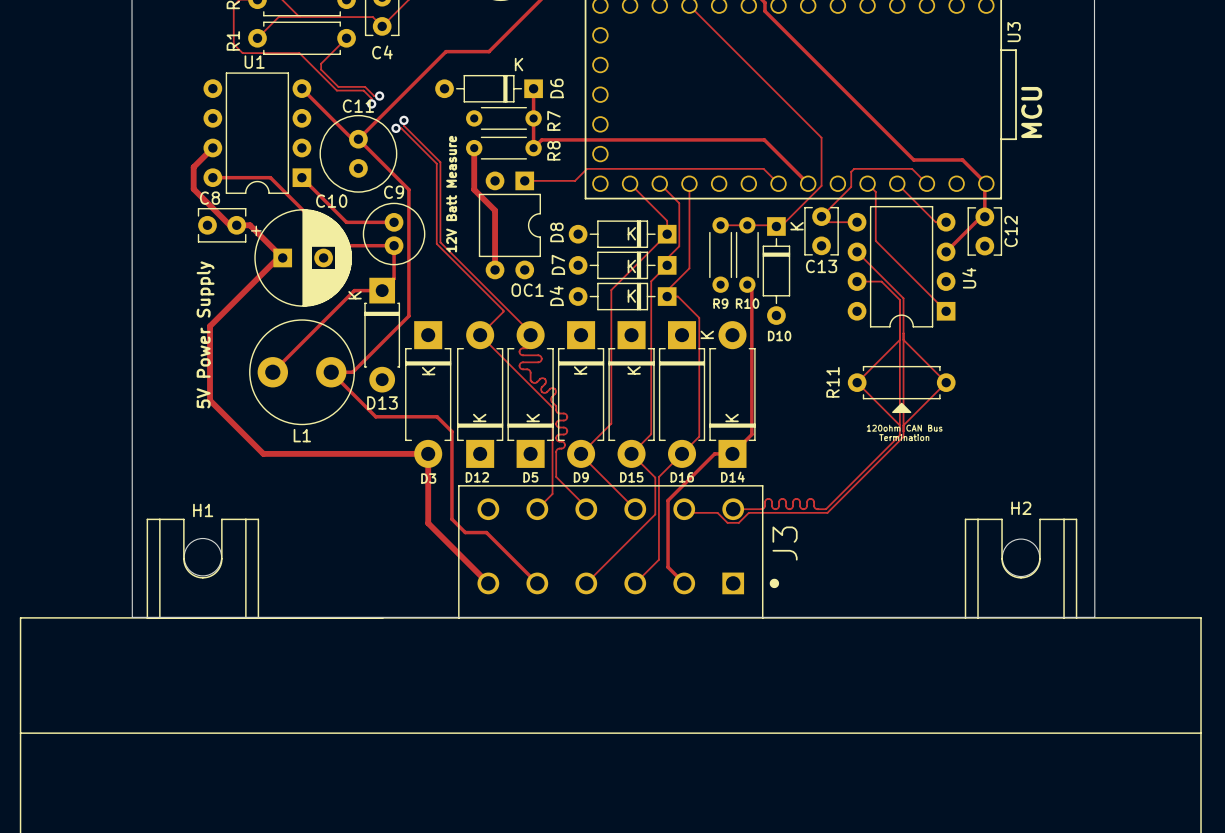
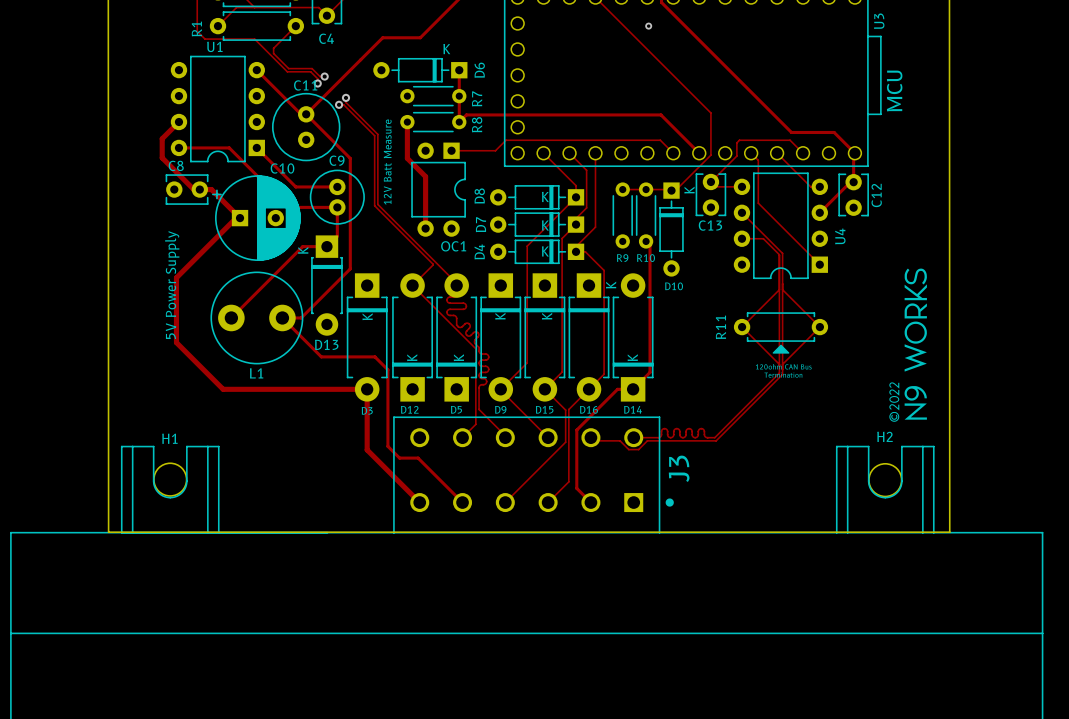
via: none -> (648, 26)
drawing: none -> [889, 268, 927, 422]

